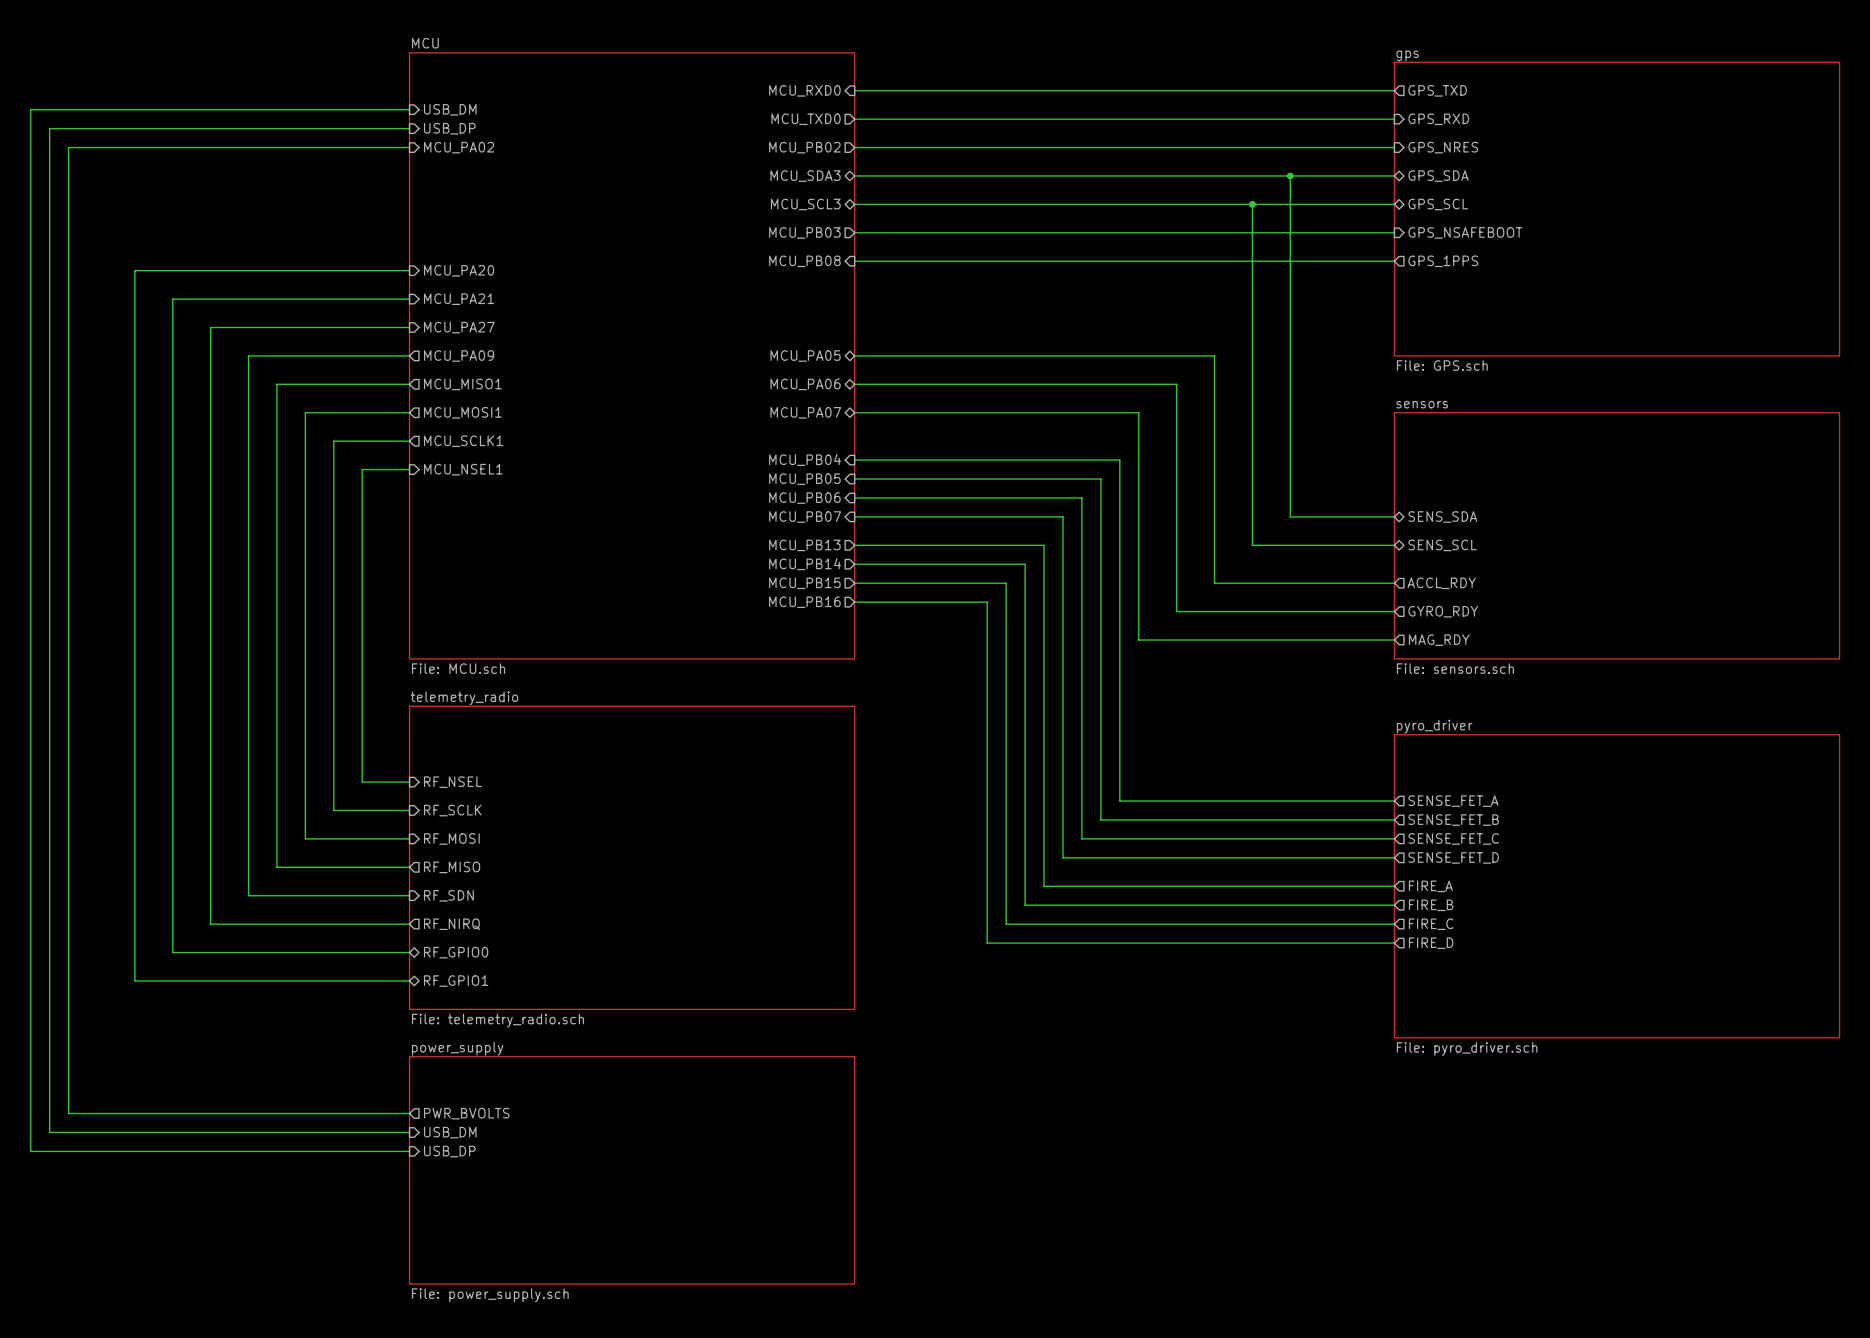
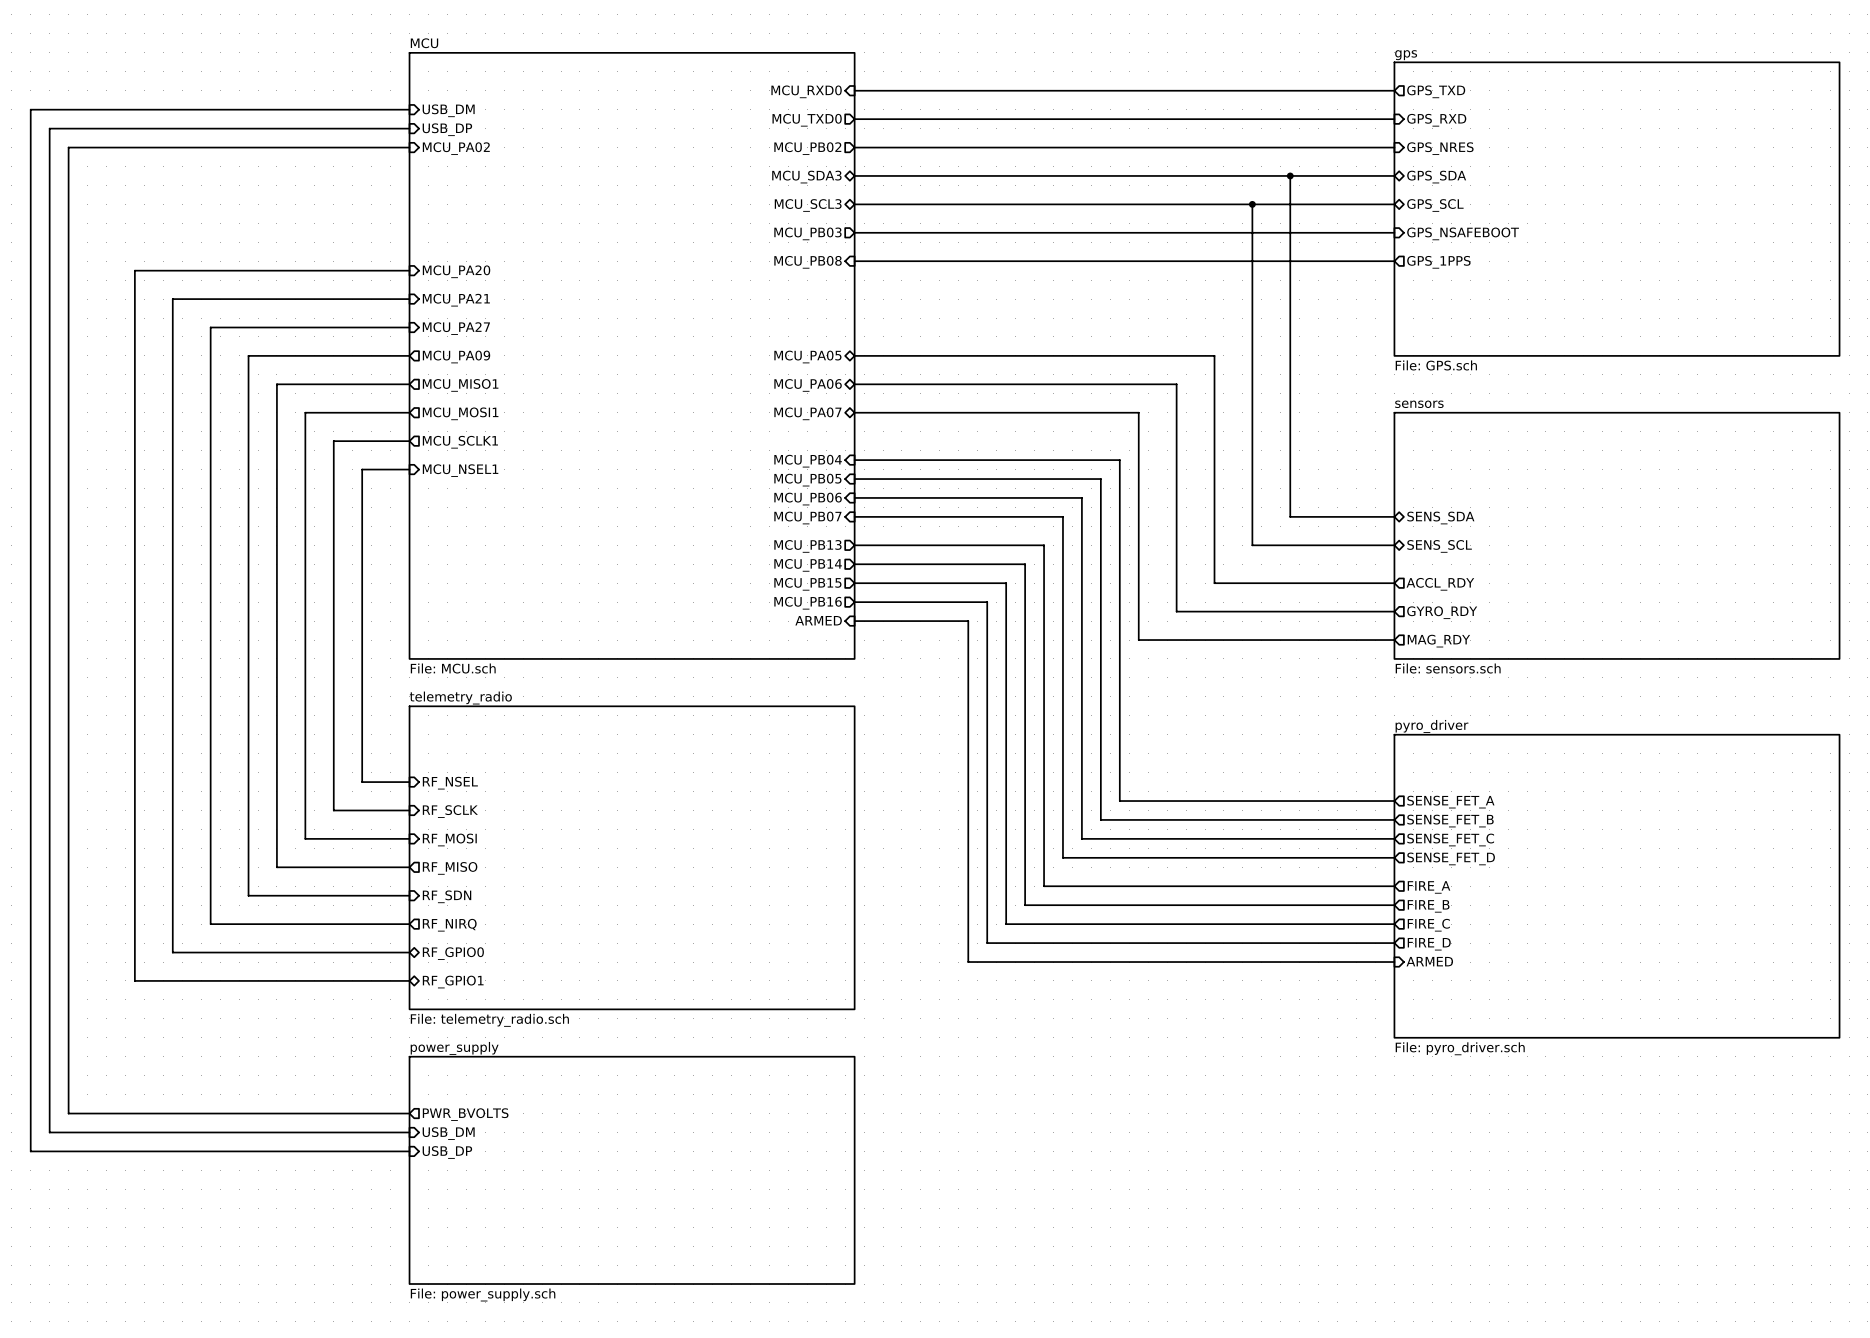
sheet pin: none -> ARMED (818, 620)
wire: none -> (854, 621) (968, 621) (968, 962) (1394, 962)
sheet pin: none -> ARMED (1429, 961)

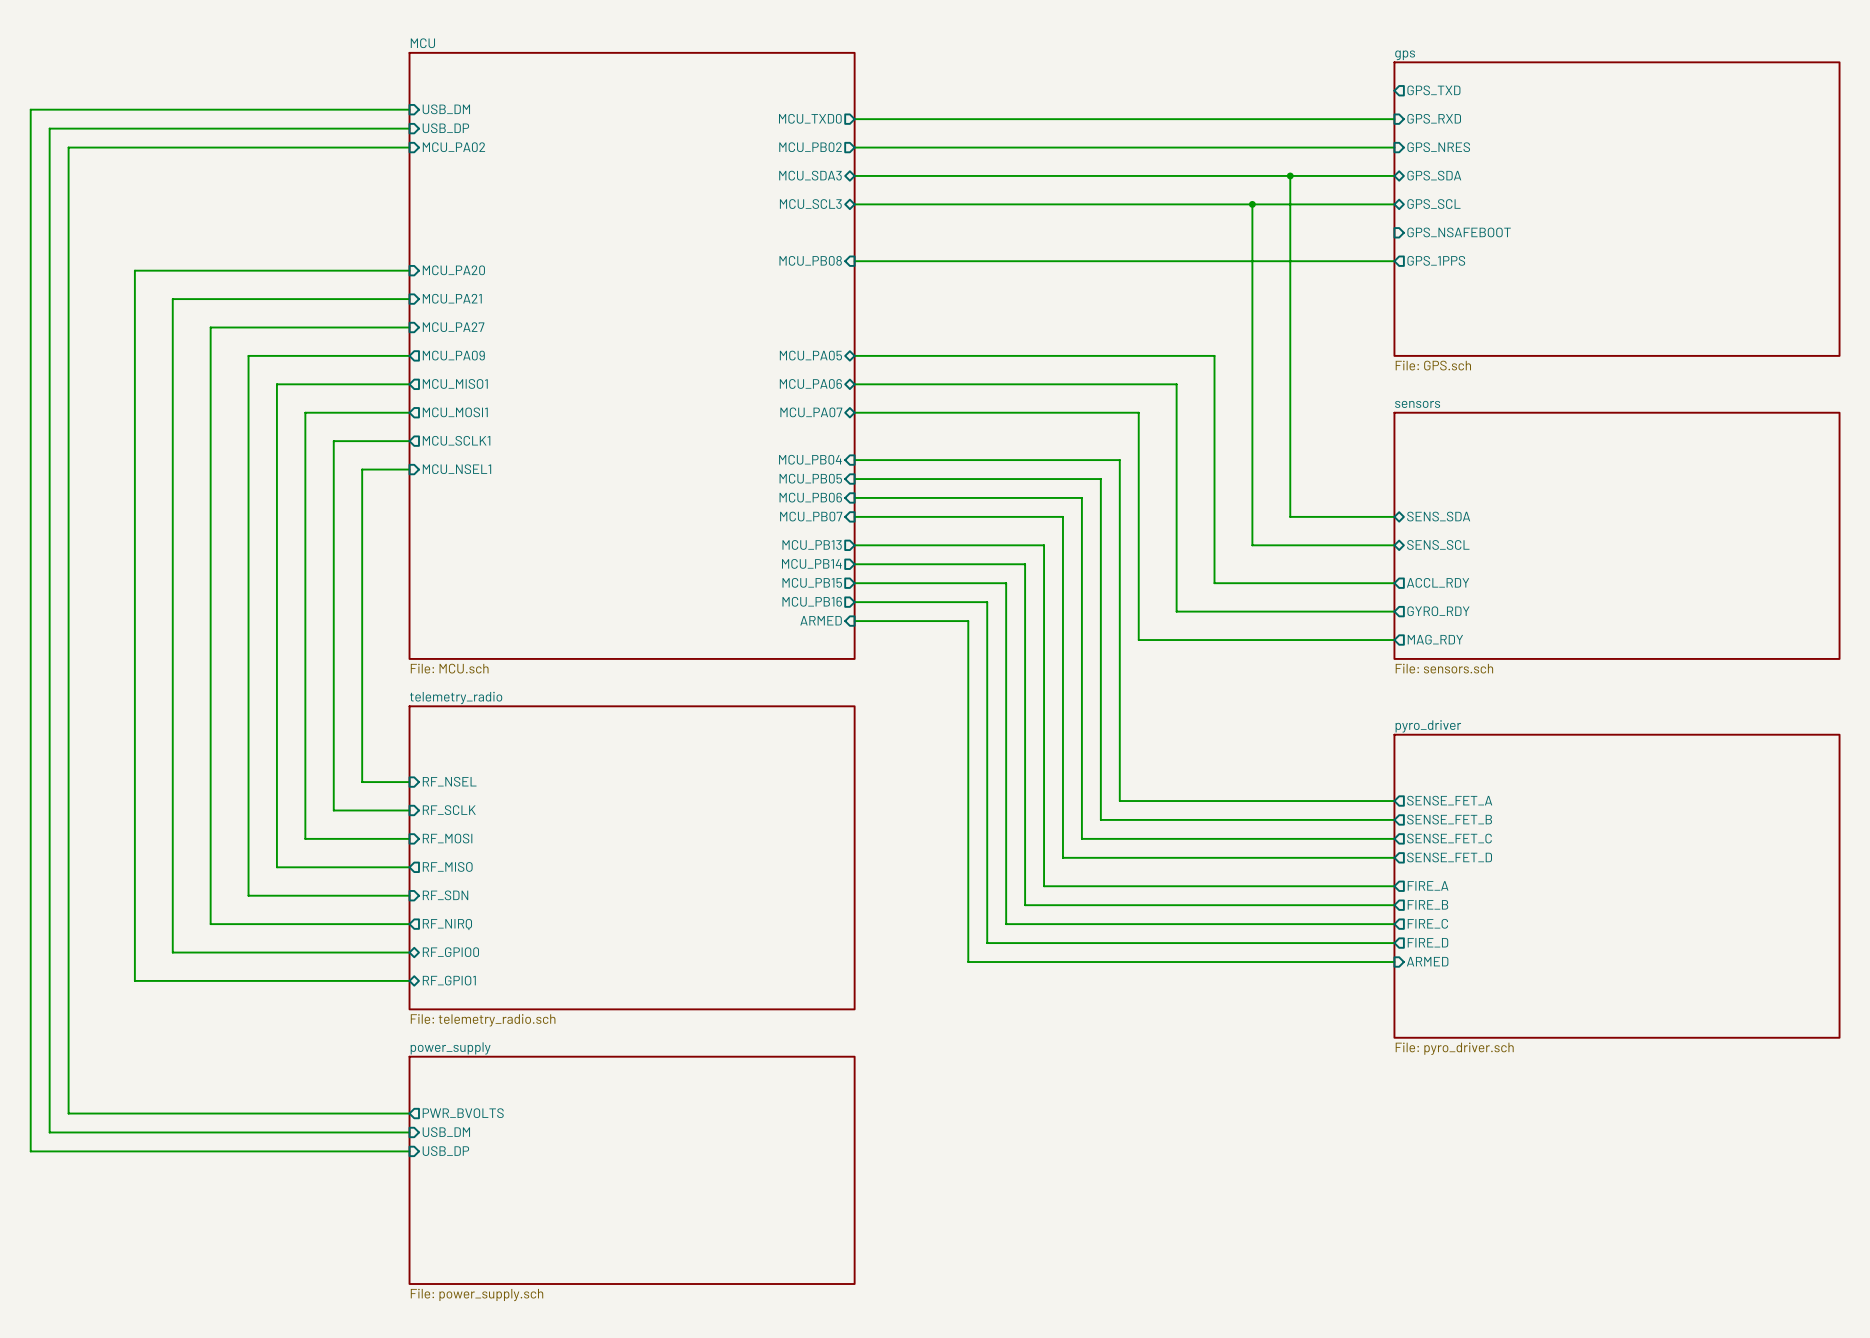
wire: (854, 90) (1394, 90) -> none
sheet pin: MCU_RXD0 (806, 91) -> none
wire: (854, 232) (1394, 232) -> none
sheet pin: MCU_PB03 (807, 233) -> none

